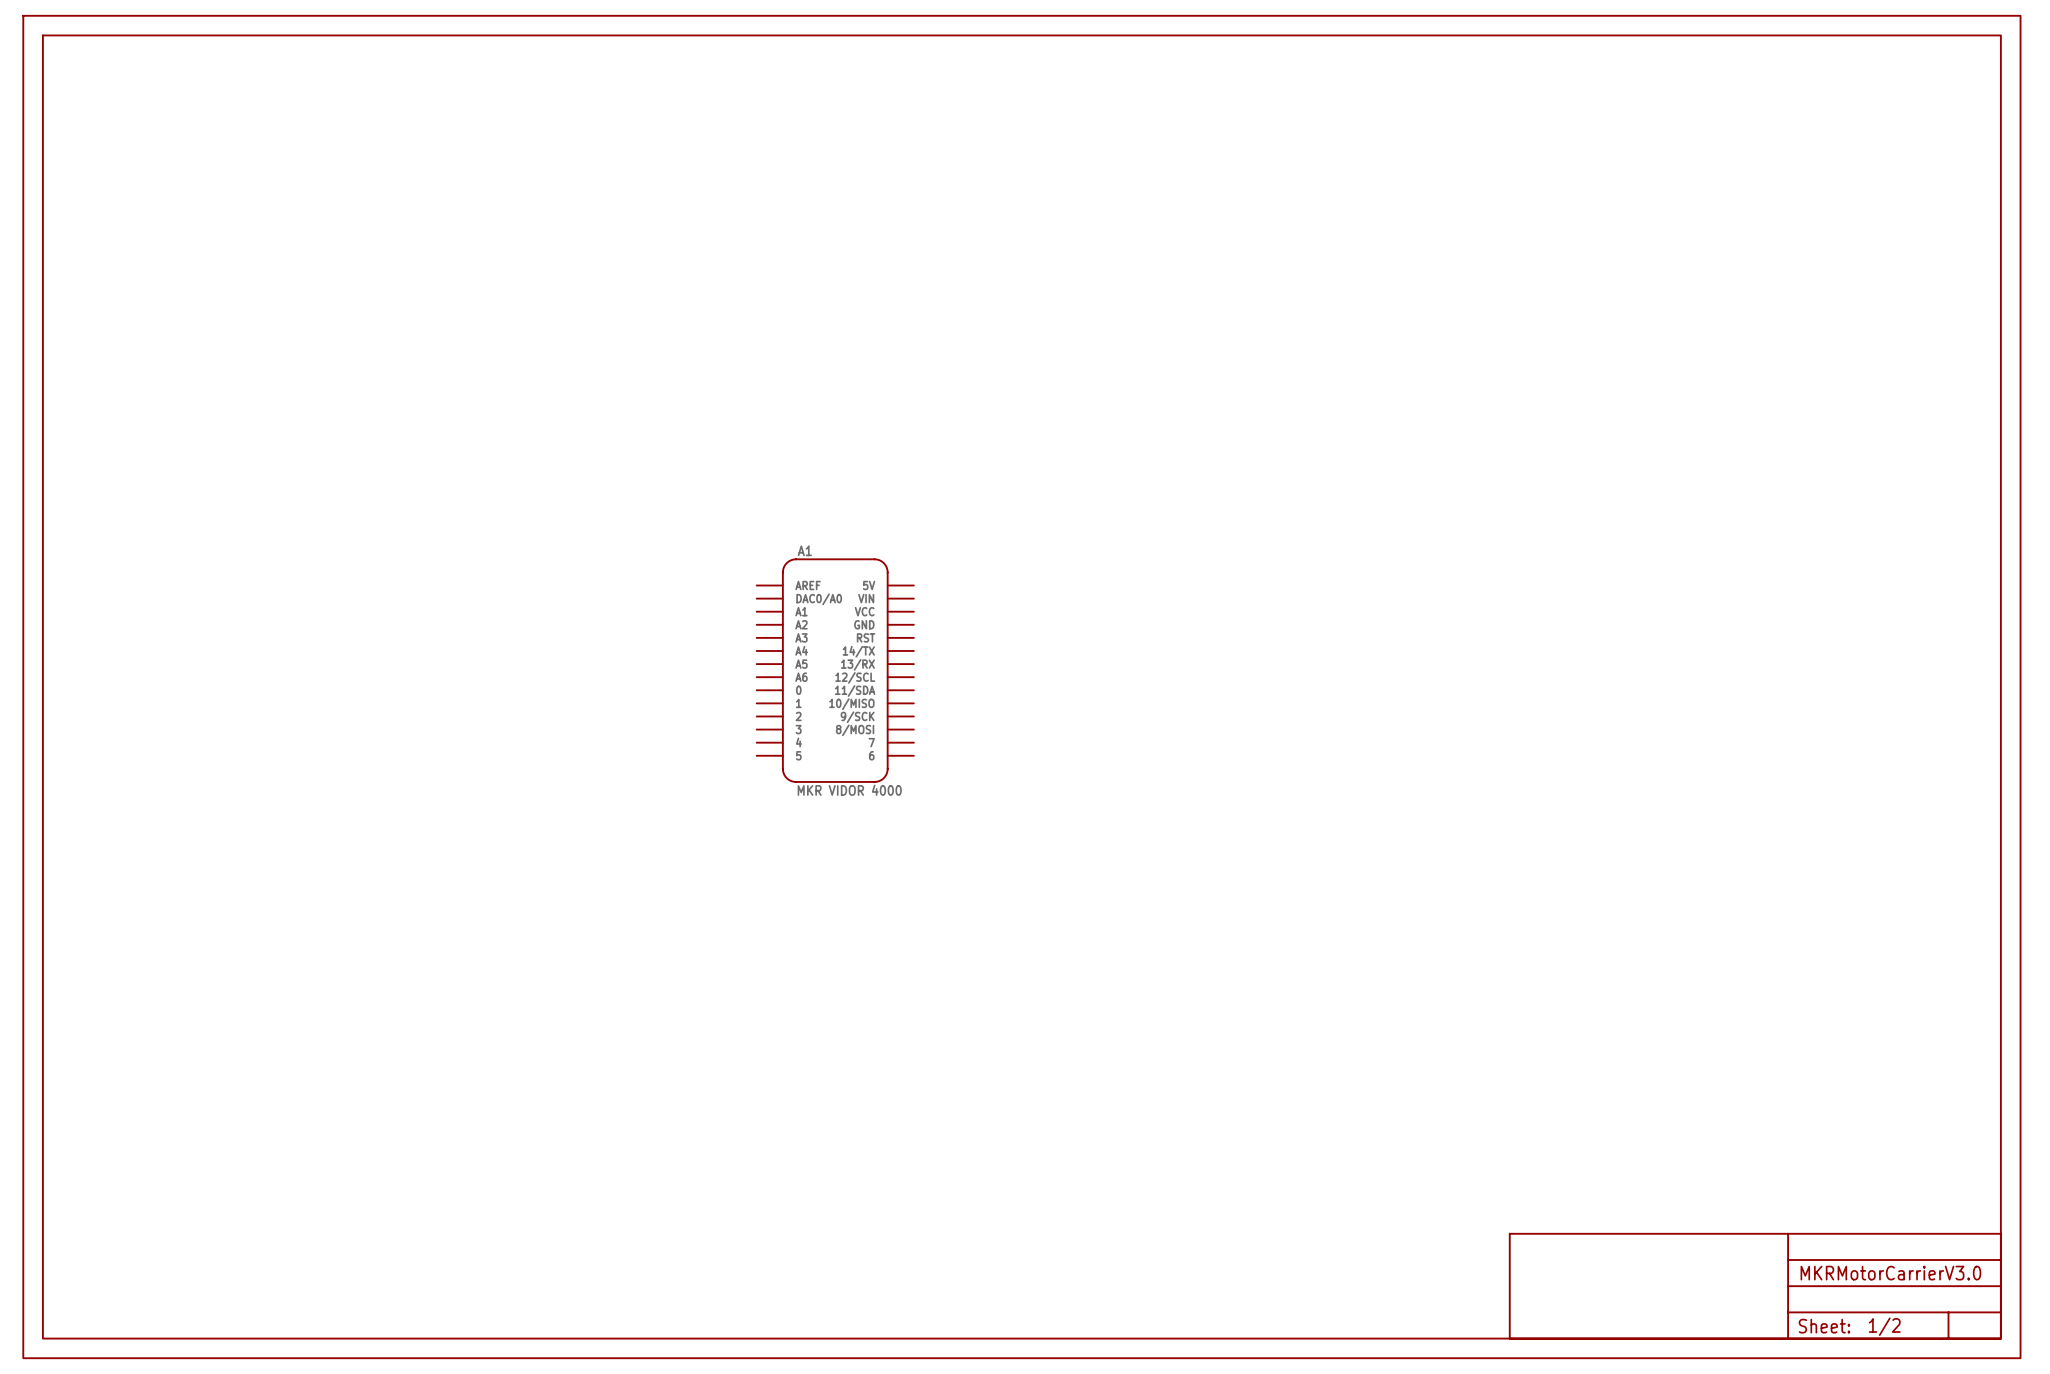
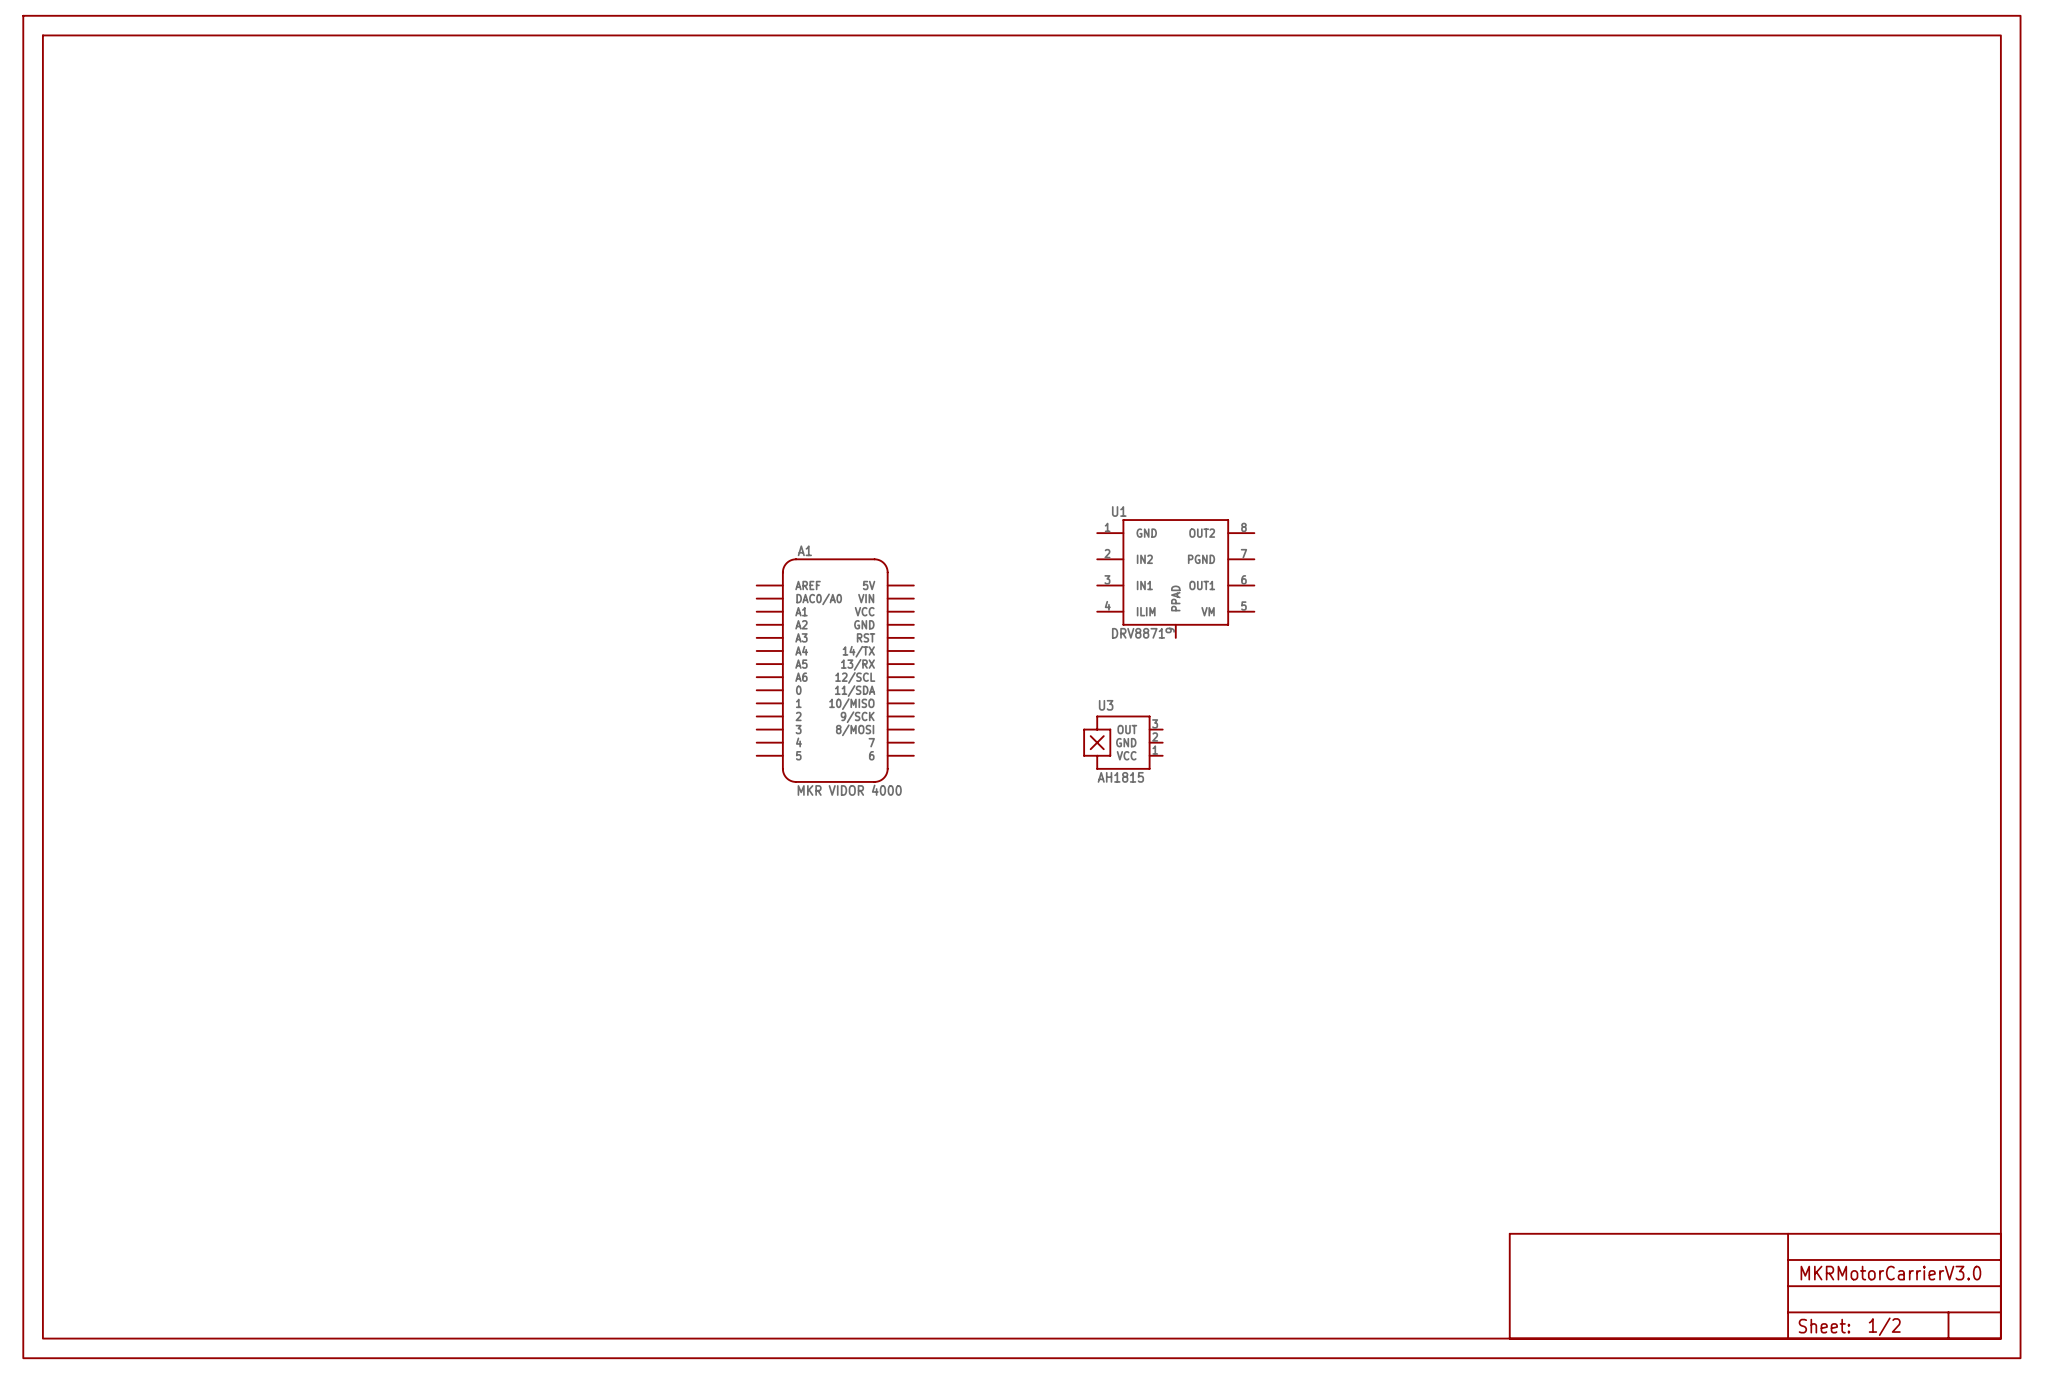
U1: none -> DRV8871 (1175, 578)
U3: none -> AH1815 (1123, 742)

